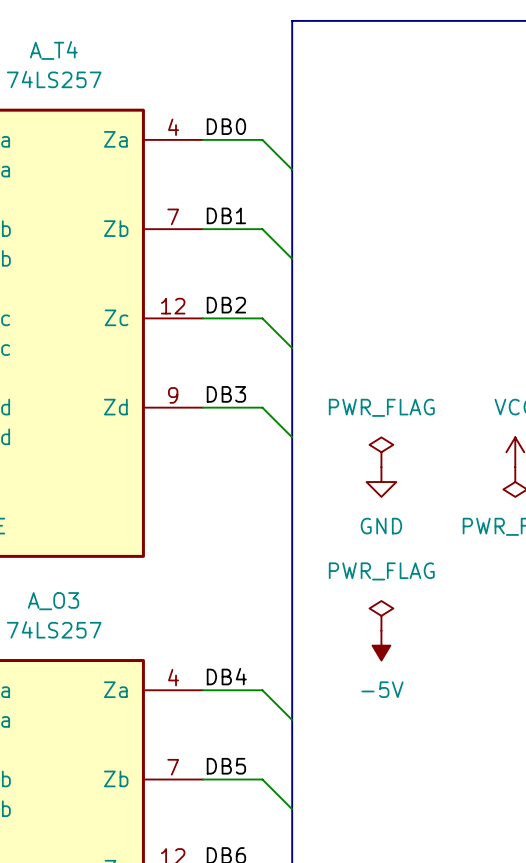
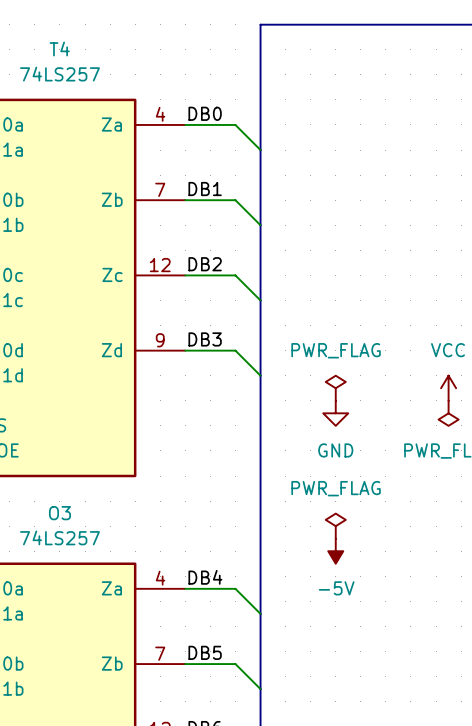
A_T4 name: A_T4 (53, 50) -> T4 (59, 48)
A_O3 name: A_O3 (53, 601) -> O3 (59, 513)

